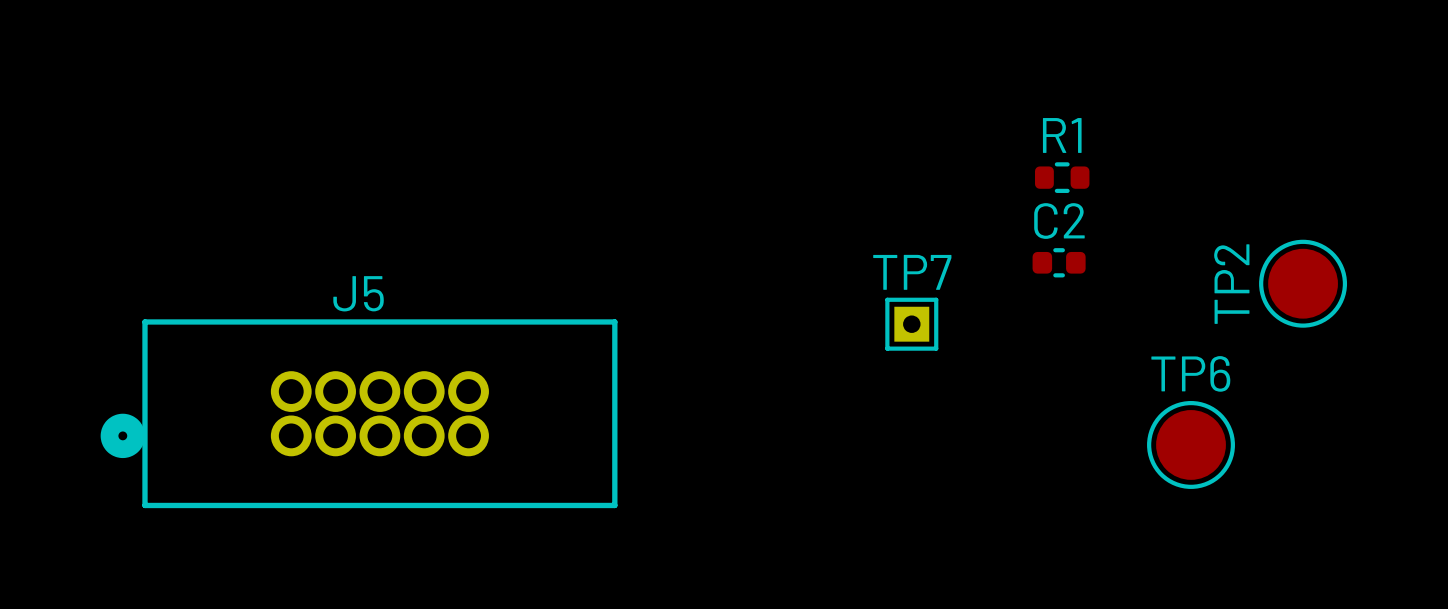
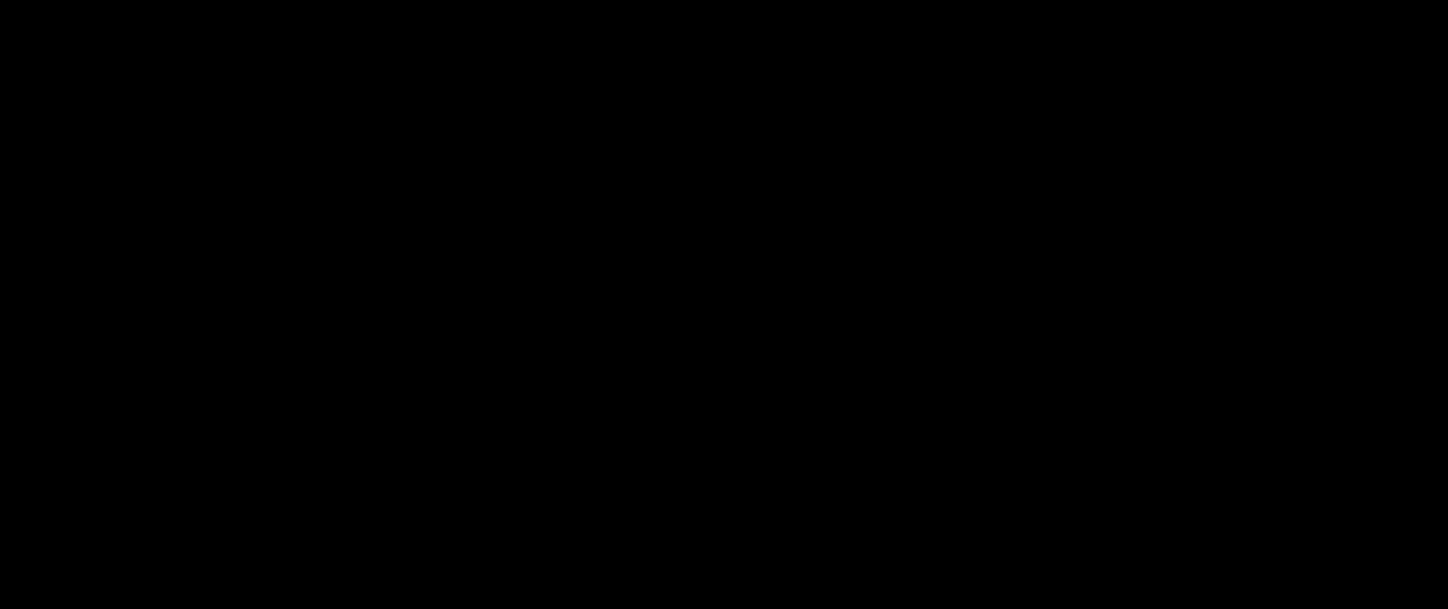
R1: (1062, 177) -> none
C2: (1059, 262) -> none
TP2: (1303, 283) -> none
TP7: (911, 324) -> none
J5: (359, 413) -> none
TP6: (1191, 444) -> none

